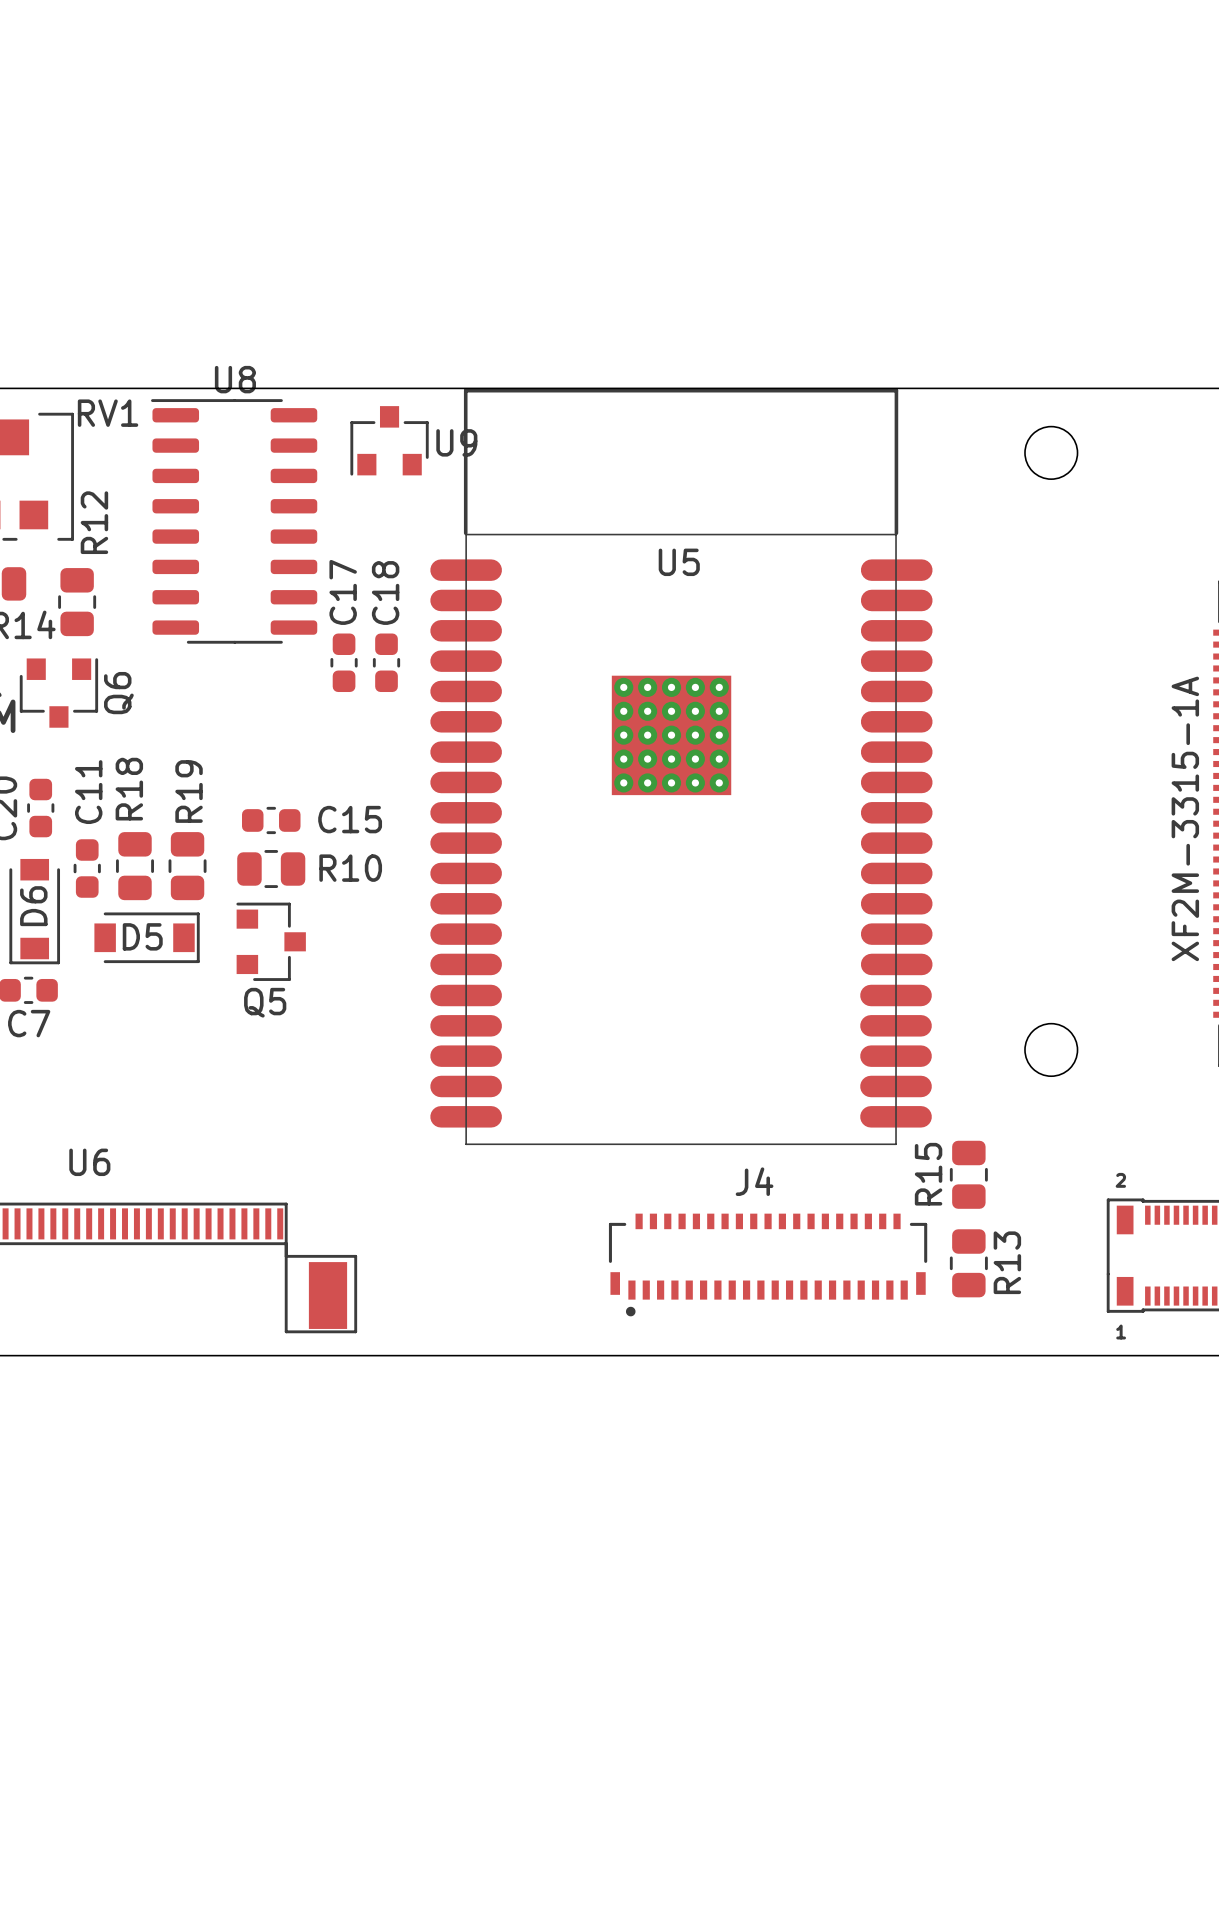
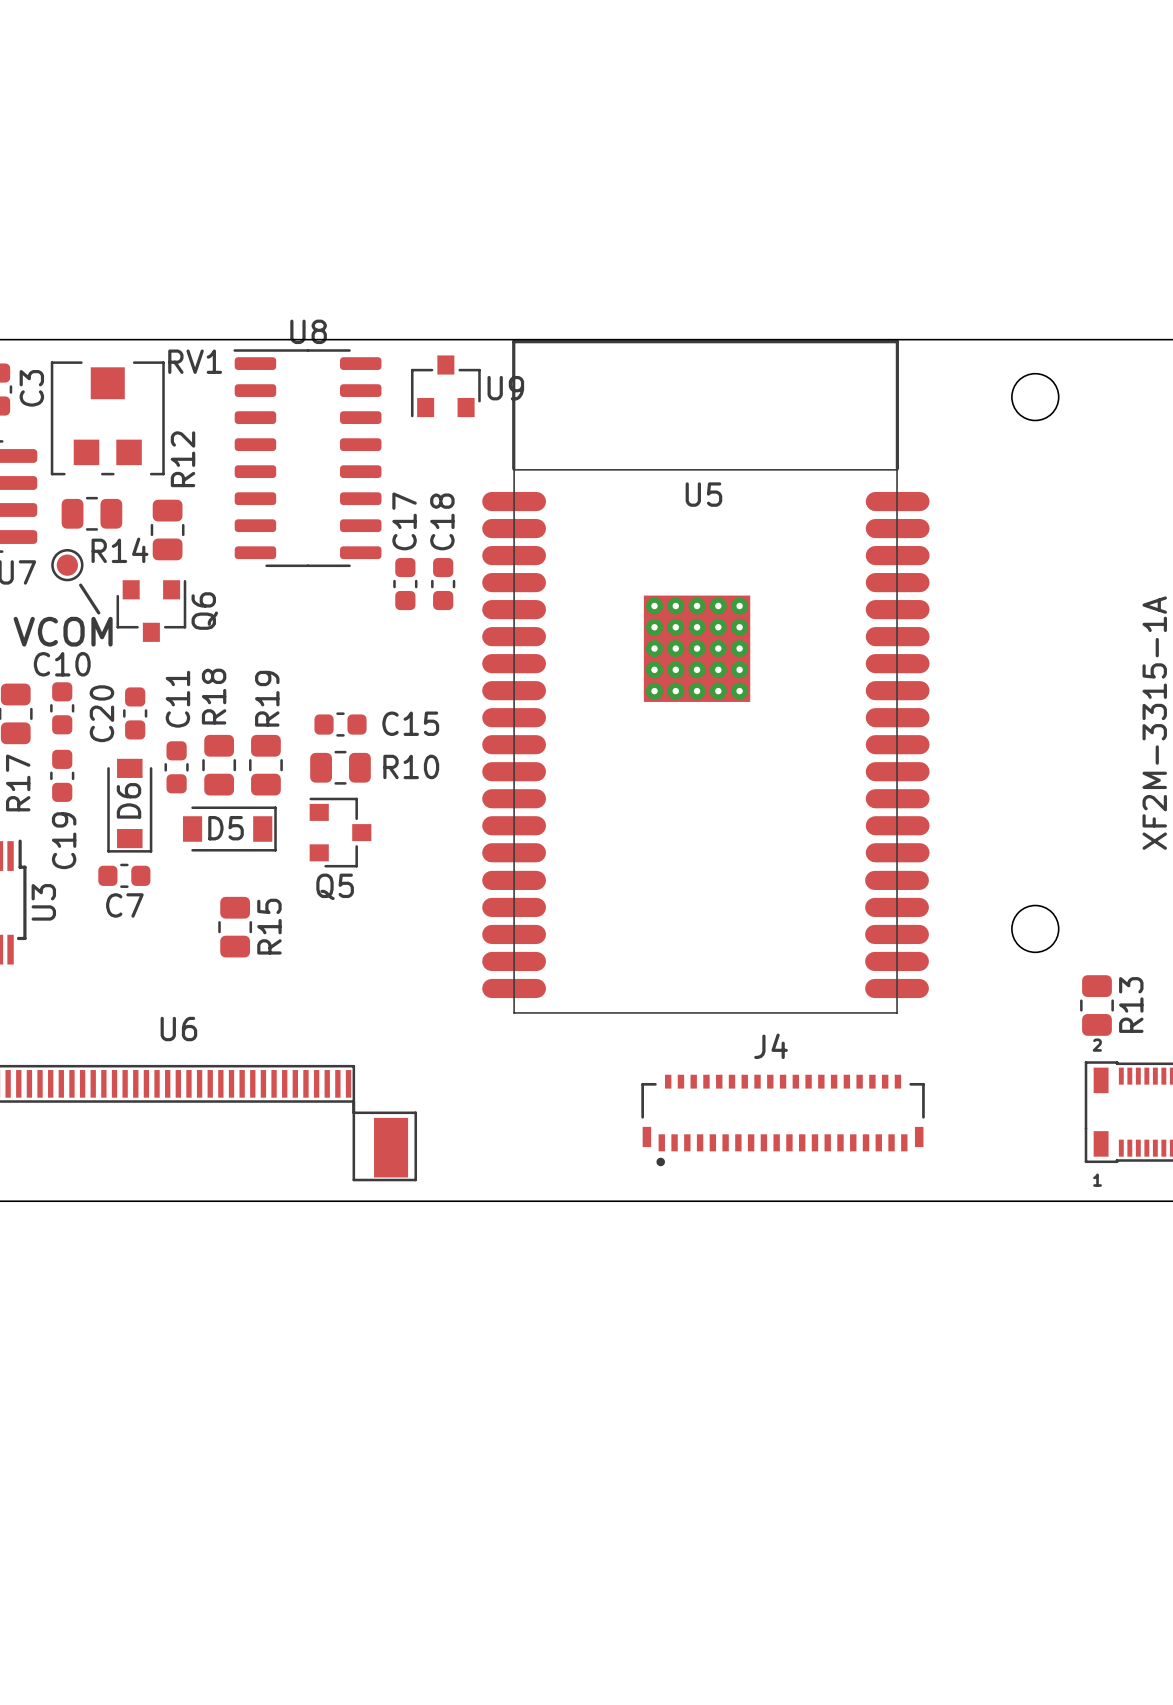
R15 name position: R15 (928, 1174) -> R15 (269, 926)
R15 position: (968, 1174) -> (235, 927)
R13 position: (968, 1263) -> (1096, 1005)

